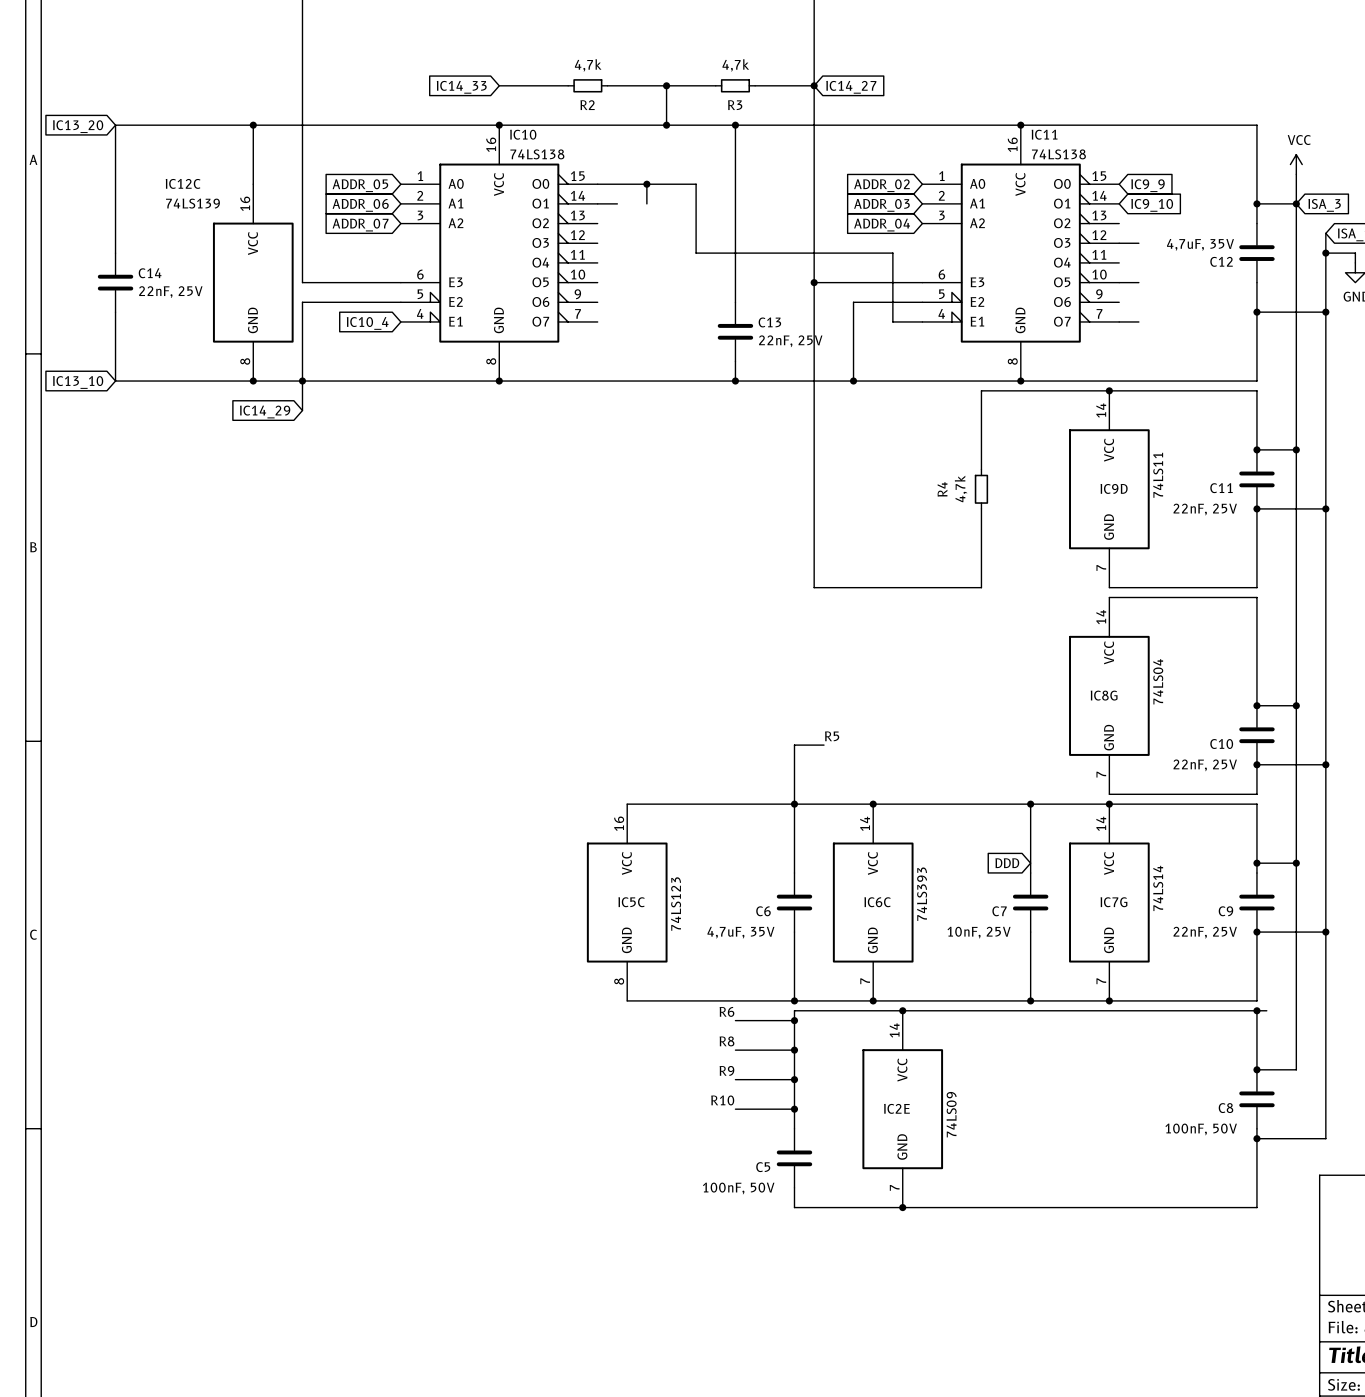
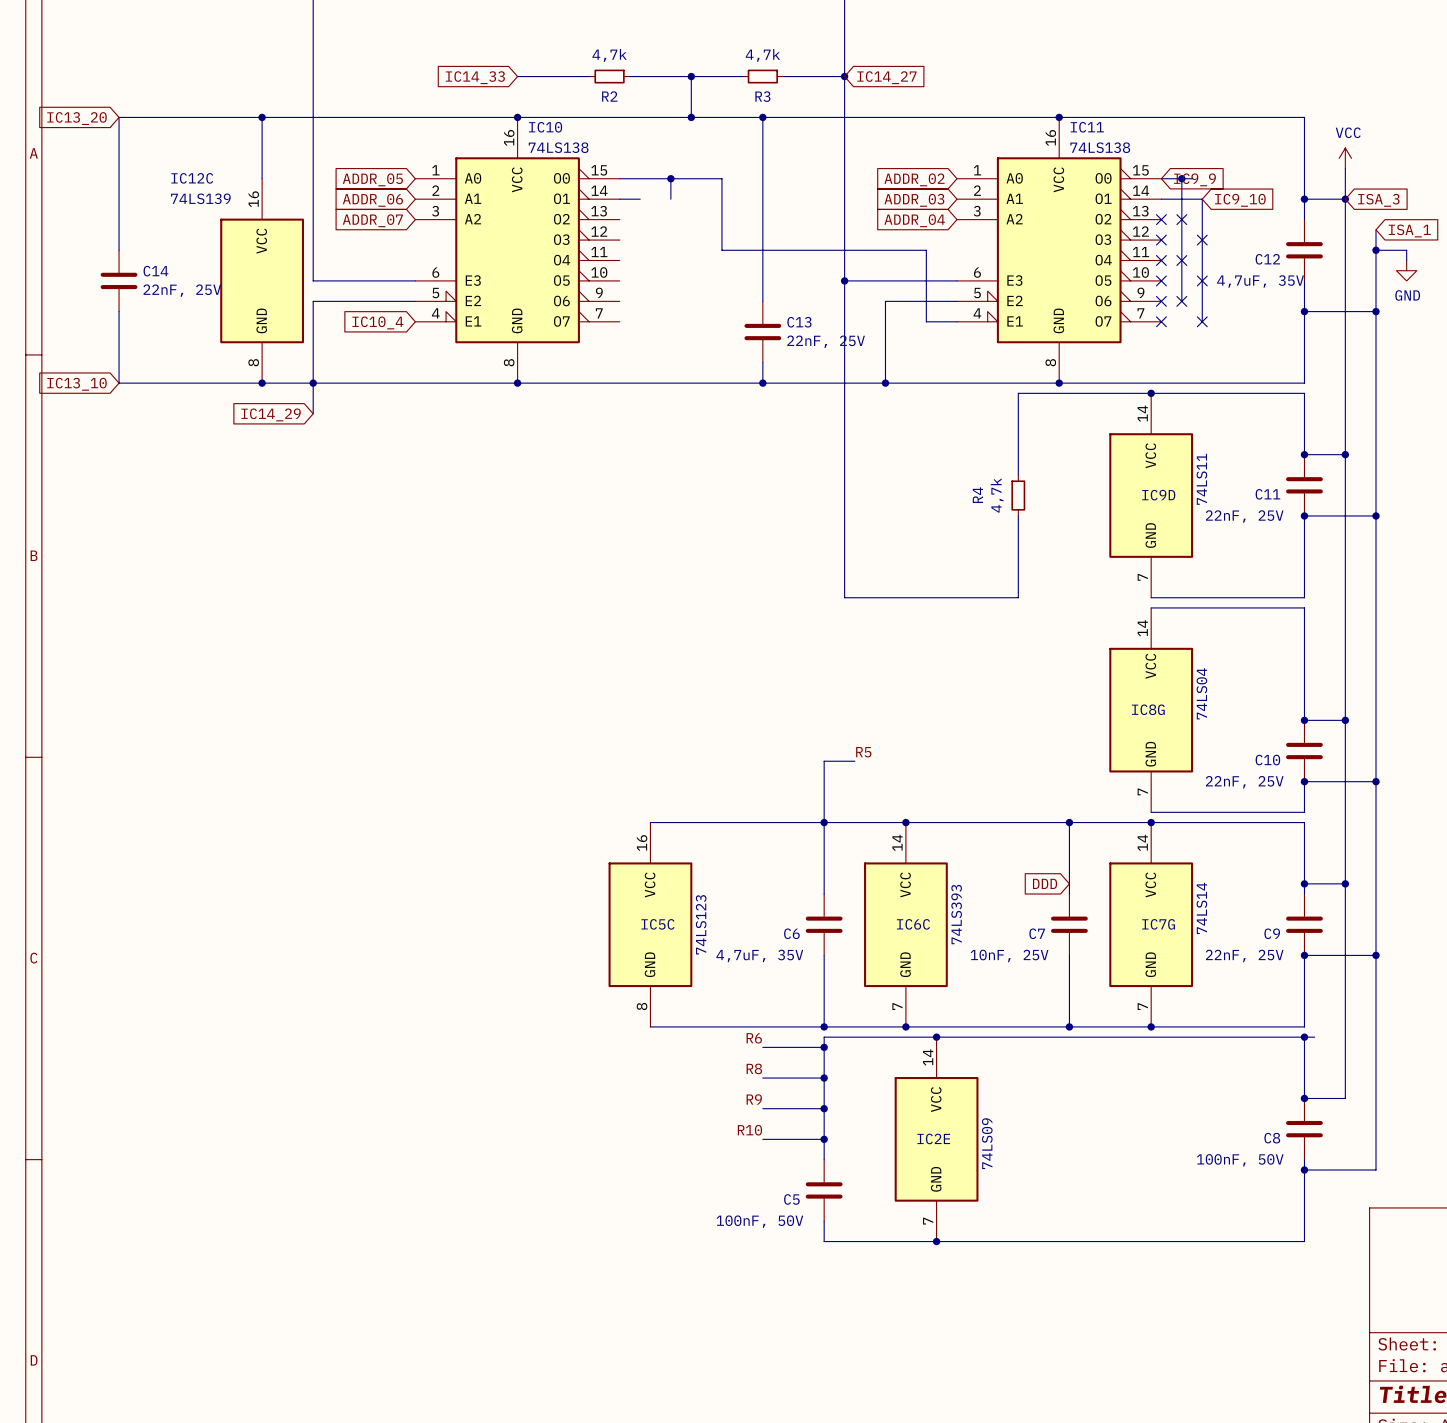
wire: none -> (1161, 178) (1192, 178)
wire: none -> (1181, 178) (1181, 301)
junction: none -> (1181, 178)
wire: none -> (1161, 199) (1202, 199) (1202, 321)
global label position: IC9_10 (1152, 205) -> IC9_10 (1240, 200)
no-connect mark: none -> (1161, 219)
no-connect mark: none -> (1181, 219)
wire: (1119, 243) (1138, 243) -> none
no-connect mark: none -> (1161, 240)
no-connect mark: none -> (1202, 240)
C12 value position: 4,7uF, 35V (1200, 244) -> 4,7uF, 35V (1260, 281)
no-connect mark: none -> (1161, 260)
no-connect mark: none -> (1181, 260)
wire: (1119, 282) (1138, 282) -> none
no-connect mark: none -> (1161, 280)
no-connect mark: none -> (1202, 280)
no-connect mark: none -> (1161, 301)
no-connect mark: none -> (1181, 301)
wire: (1119, 321) (1138, 321) -> none
no-connect mark: none -> (1161, 321)
no-connect mark: none -> (1202, 321)

